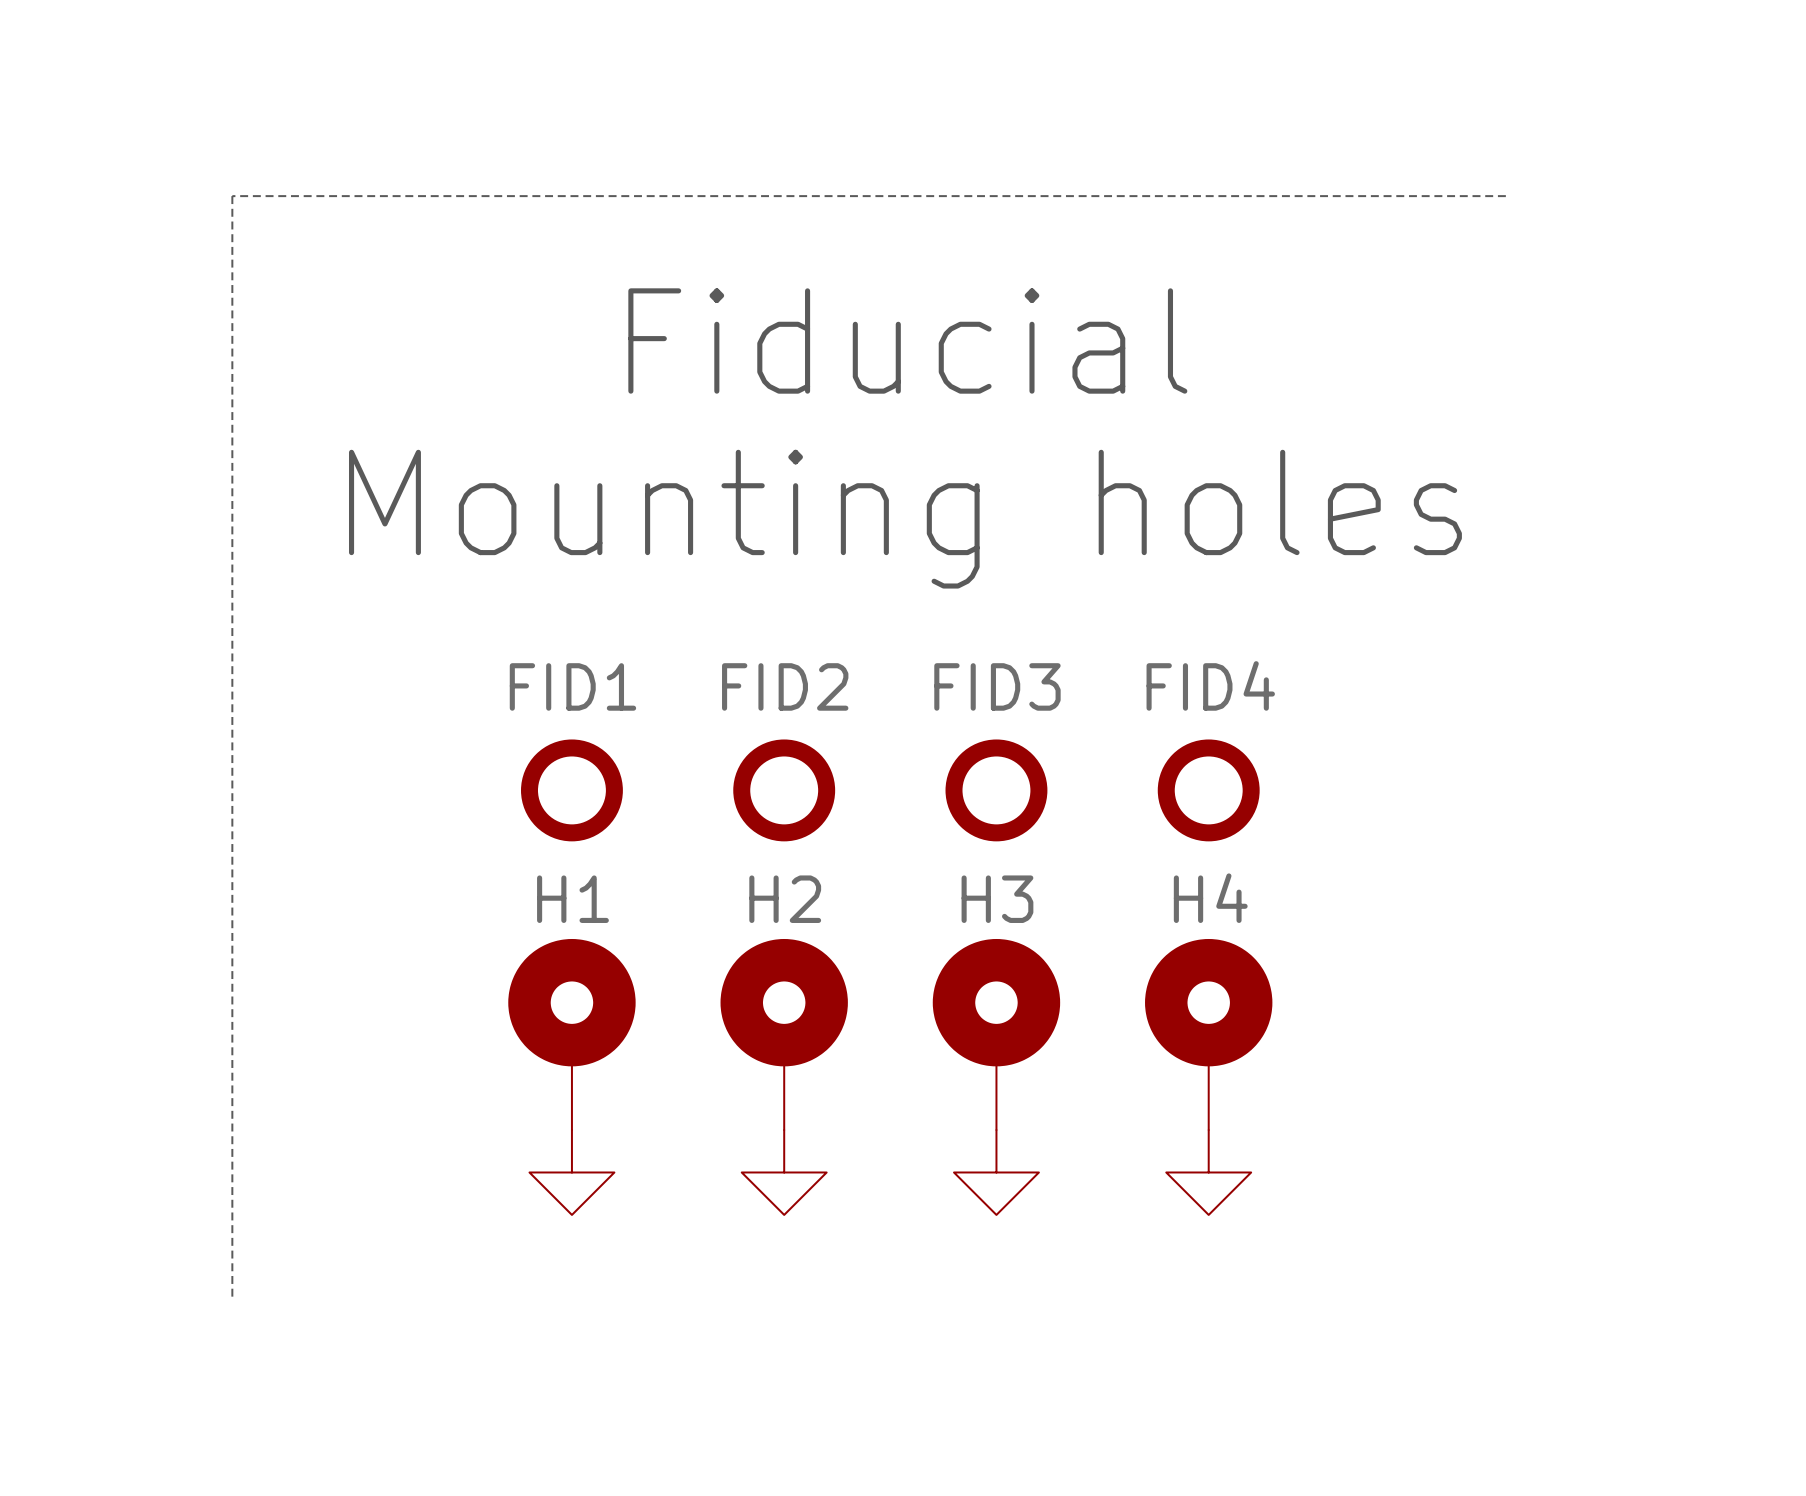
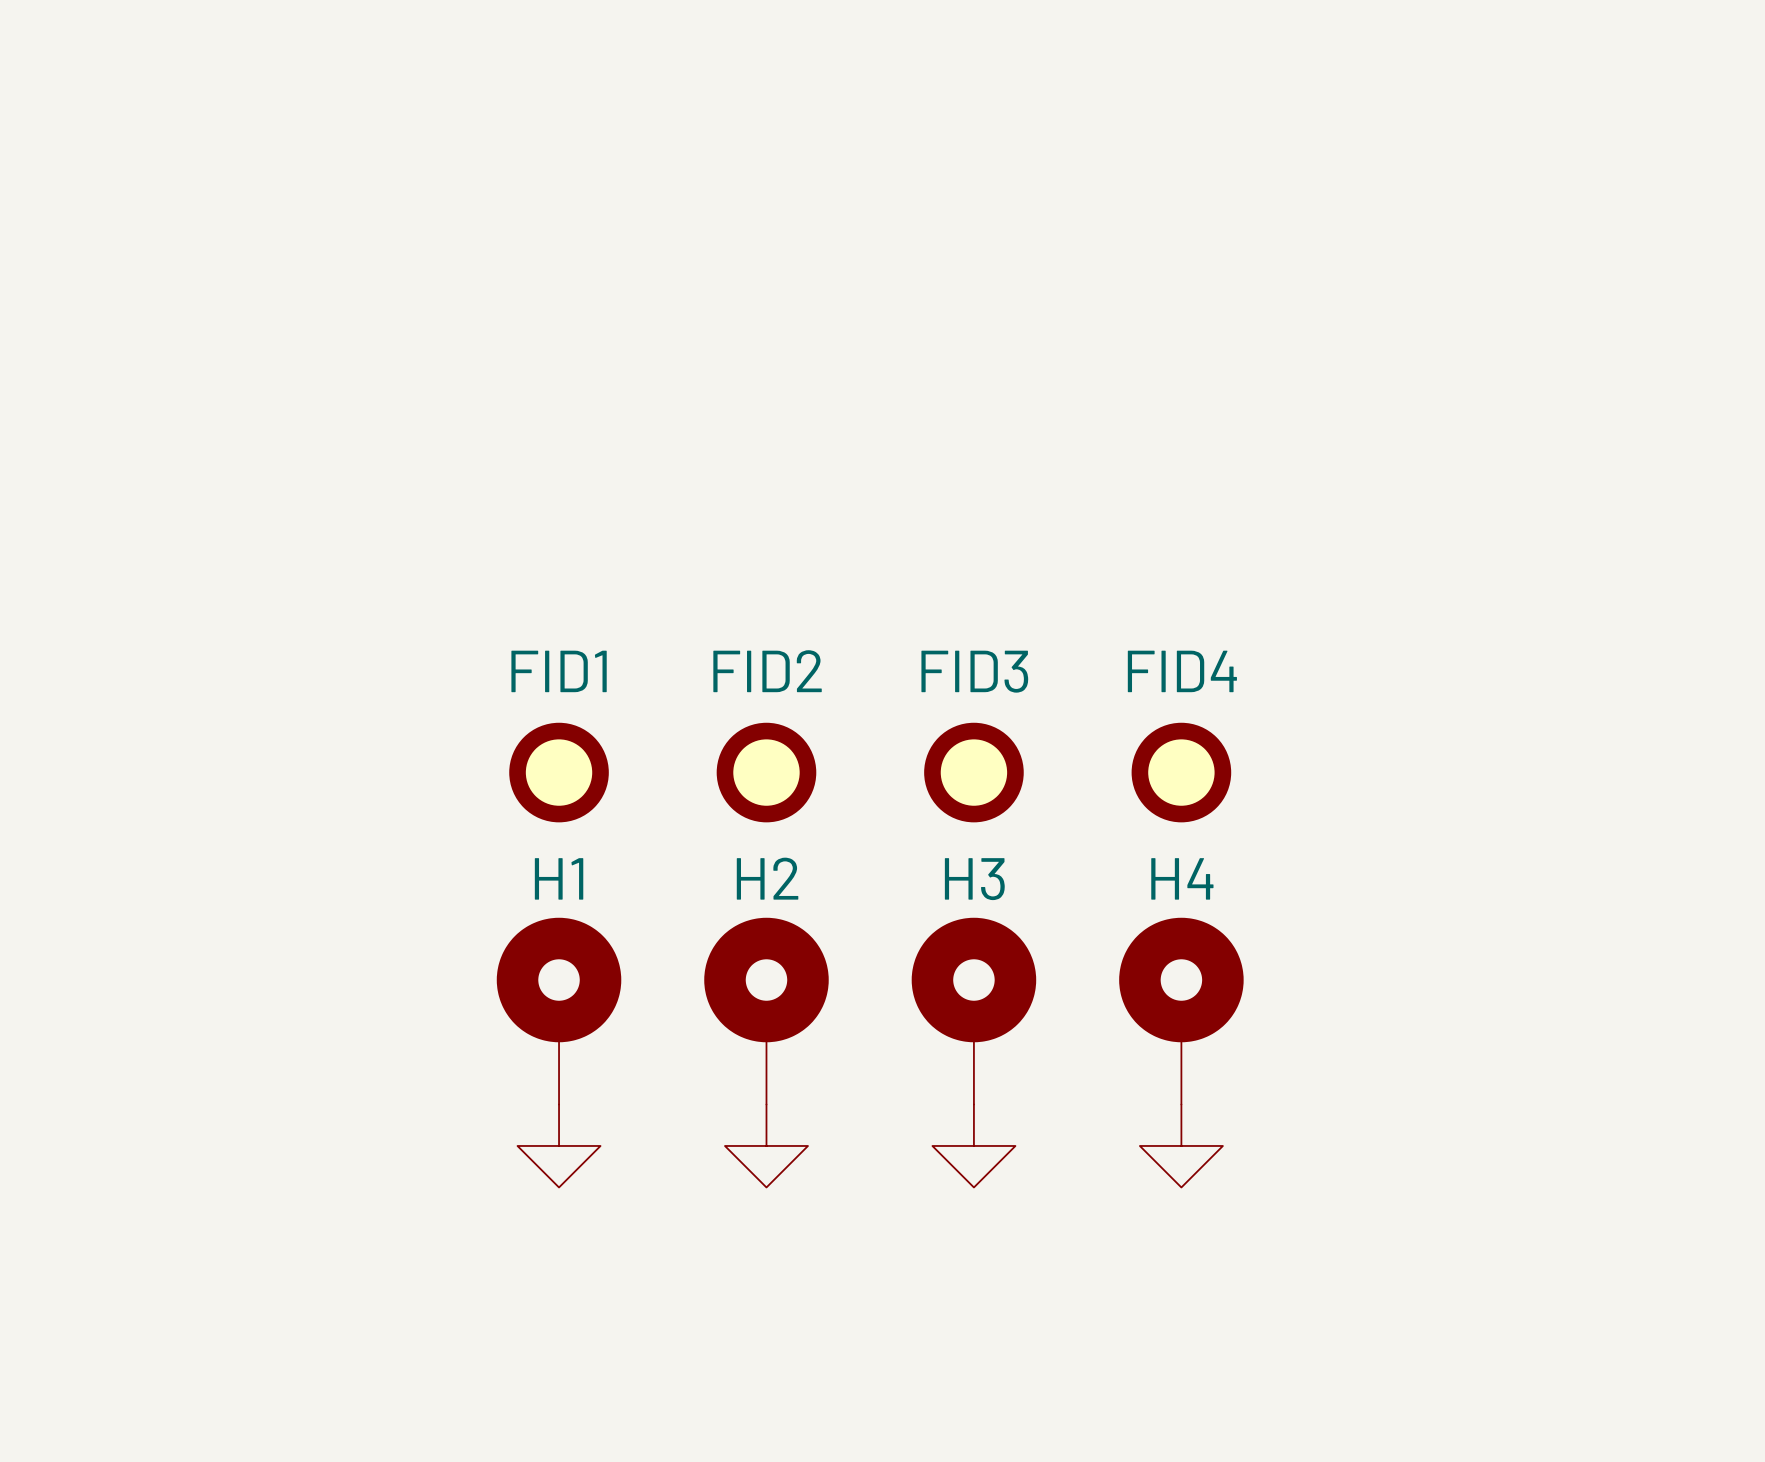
line: (1505, 196) (232, 196) (232, 1299) -> none
text: Fiducial (907, 341) -> none
text: Mounting holes (905, 519) -> none

